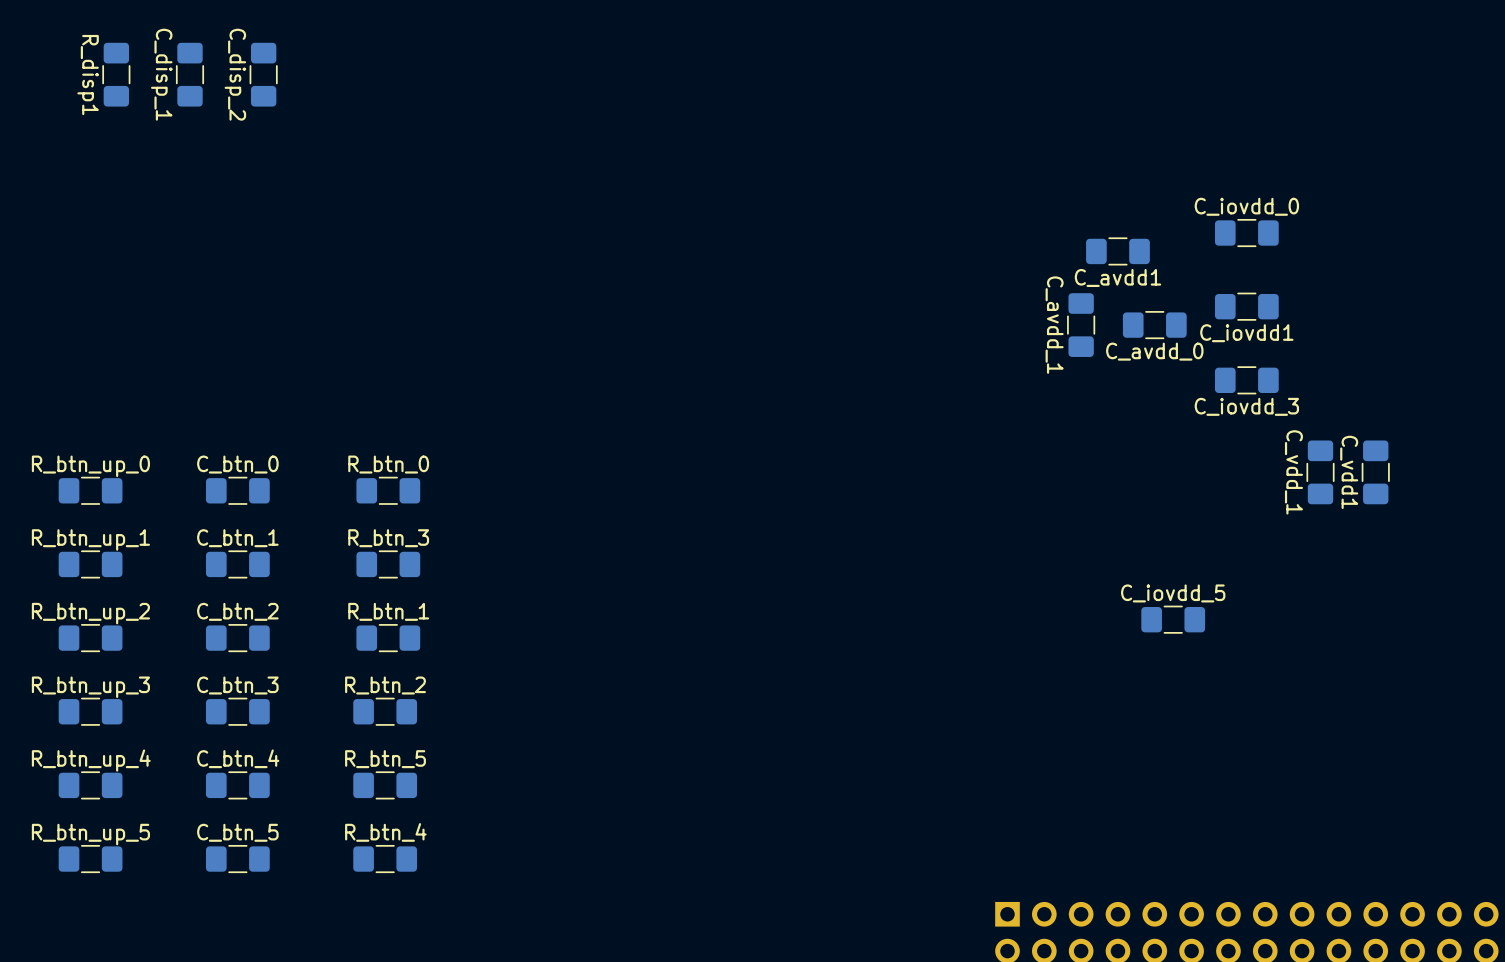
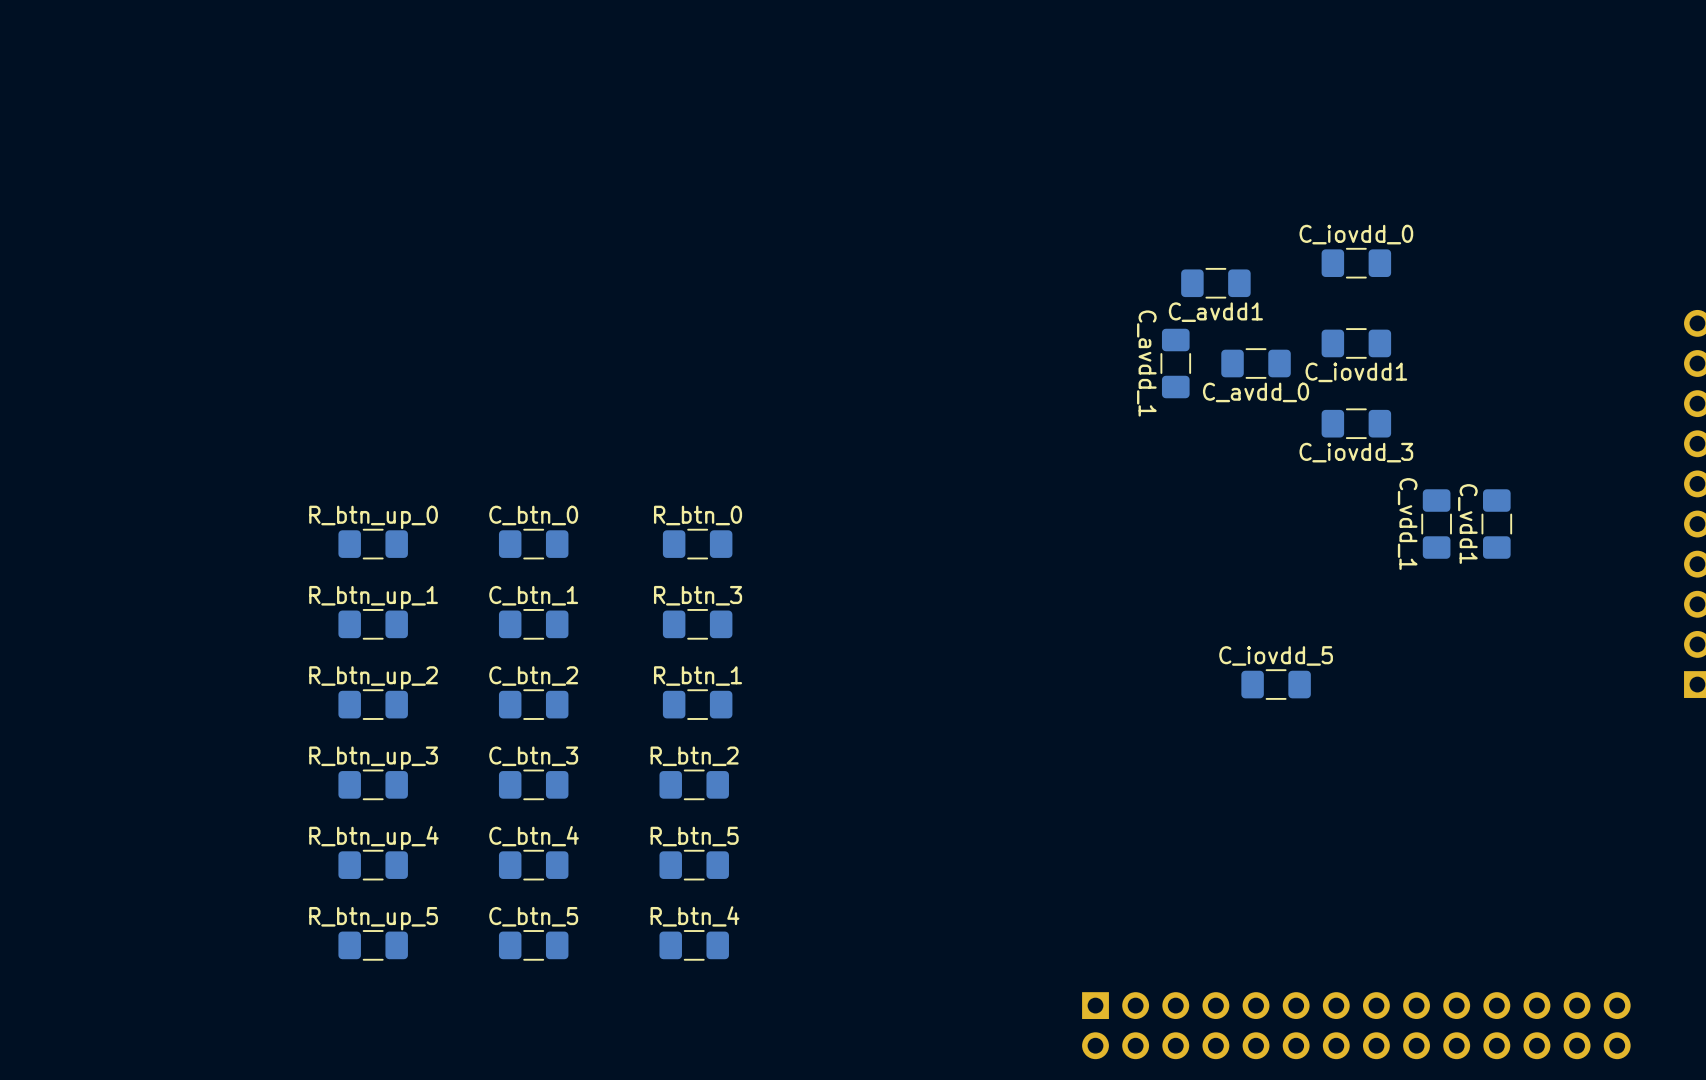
R_disp1: (116, 74) -> none
C_disp_1: (190, 74) -> none
C_disp_2: (263, 74) -> none
R_btn_up_0 position: (90, 490) -> (373, 544)
C_btn_0 position: (237, 490) -> (533, 544)
R_btn_0 position: (388, 490) -> (697, 544)
R_btn_up_1 position: (90, 564) -> (373, 624)
C_btn_1 position: (237, 564) -> (533, 624)
R_btn_3 position: (388, 564) -> (697, 624)
R_btn_up_2 position: (90, 638) -> (373, 704)
C_btn_2 position: (237, 638) -> (533, 704)
R_btn_1 position: (388, 638) -> (697, 704)
R_btn_up_3 position: (90, 711) -> (373, 784)
C_btn_3 position: (237, 711) -> (533, 784)
R_btn_2 position: (385, 711) -> (694, 784)
R_btn_up_4 position: (90, 785) -> (373, 865)
C_btn_4 position: (237, 785) -> (533, 865)
R_btn_5 position: (385, 785) -> (694, 865)
R_btn_up_5 position: (90, 859) -> (373, 945)
C_btn_5 position: (237, 859) -> (533, 945)
R_btn_4 position: (385, 859) -> (694, 945)

